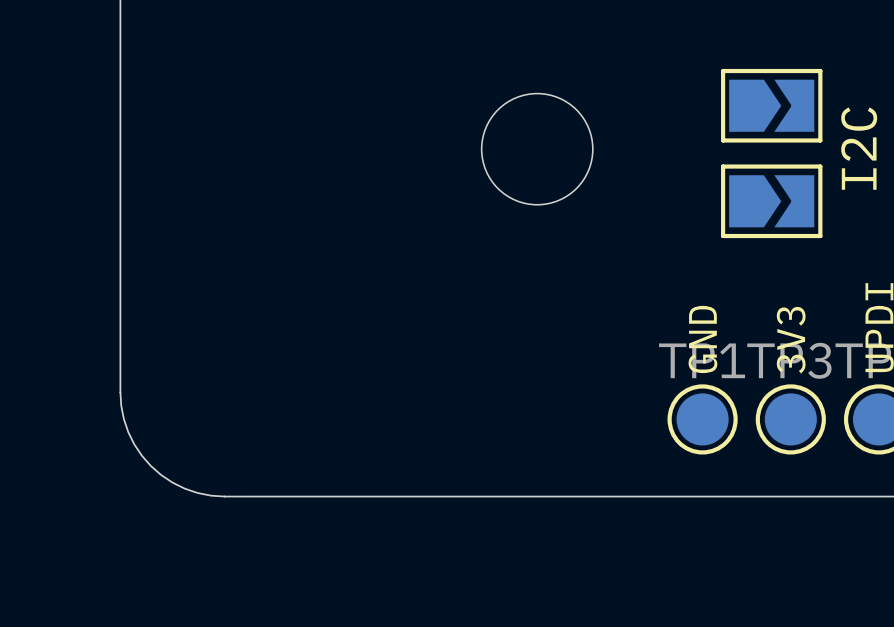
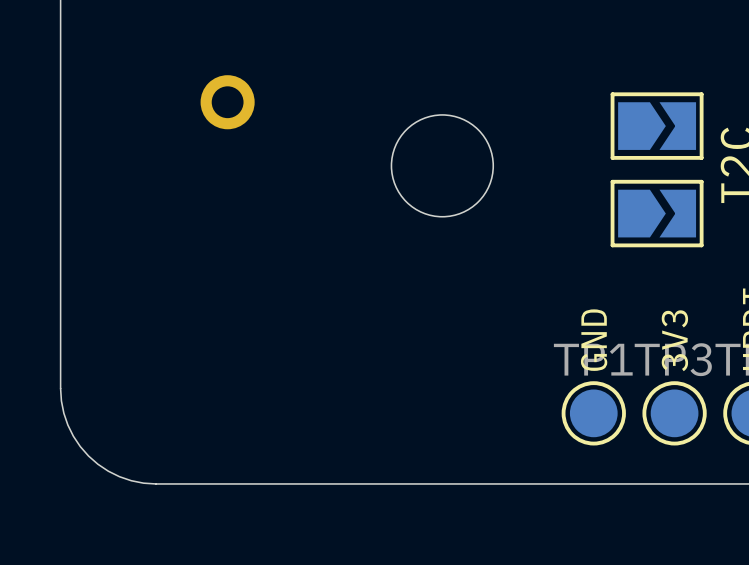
part: none -> (227, 102)

